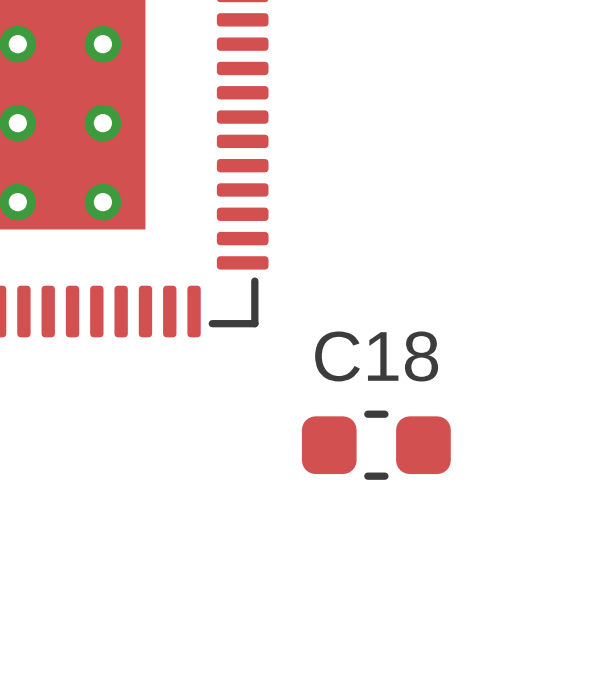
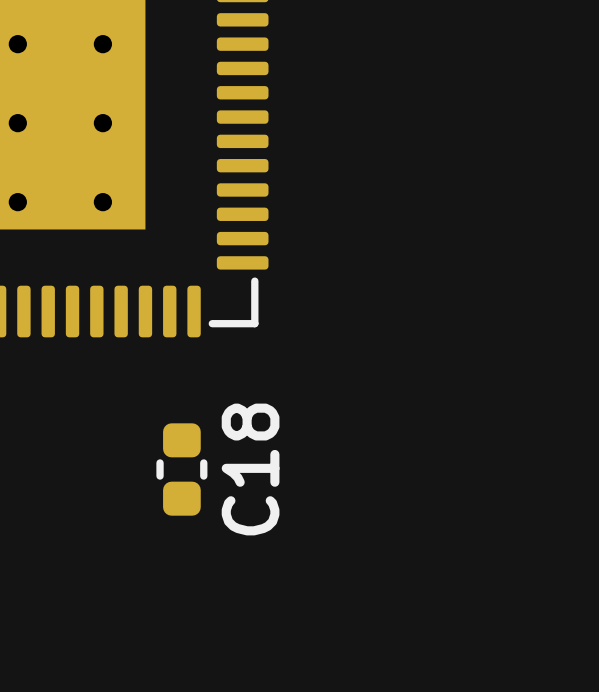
C18 footprint: [301, 410, 451, 480] -> [156, 423, 208, 516]

